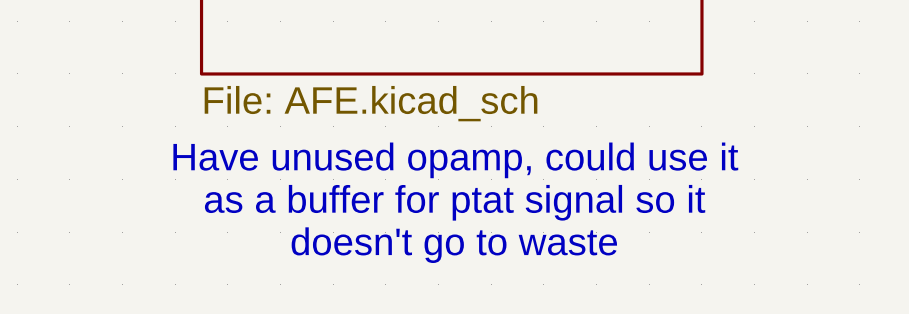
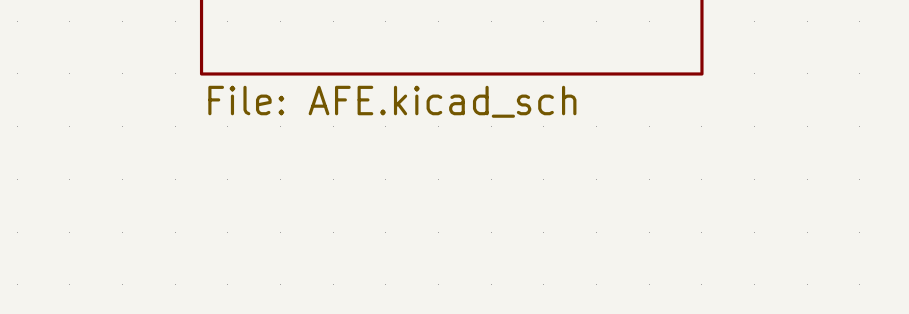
text: Have unused opamp, could use it (455, 160) -> none
text: as a buffer for ptat signal so it (455, 202) -> none
text: doesn't go to waste (454, 245) -> none

